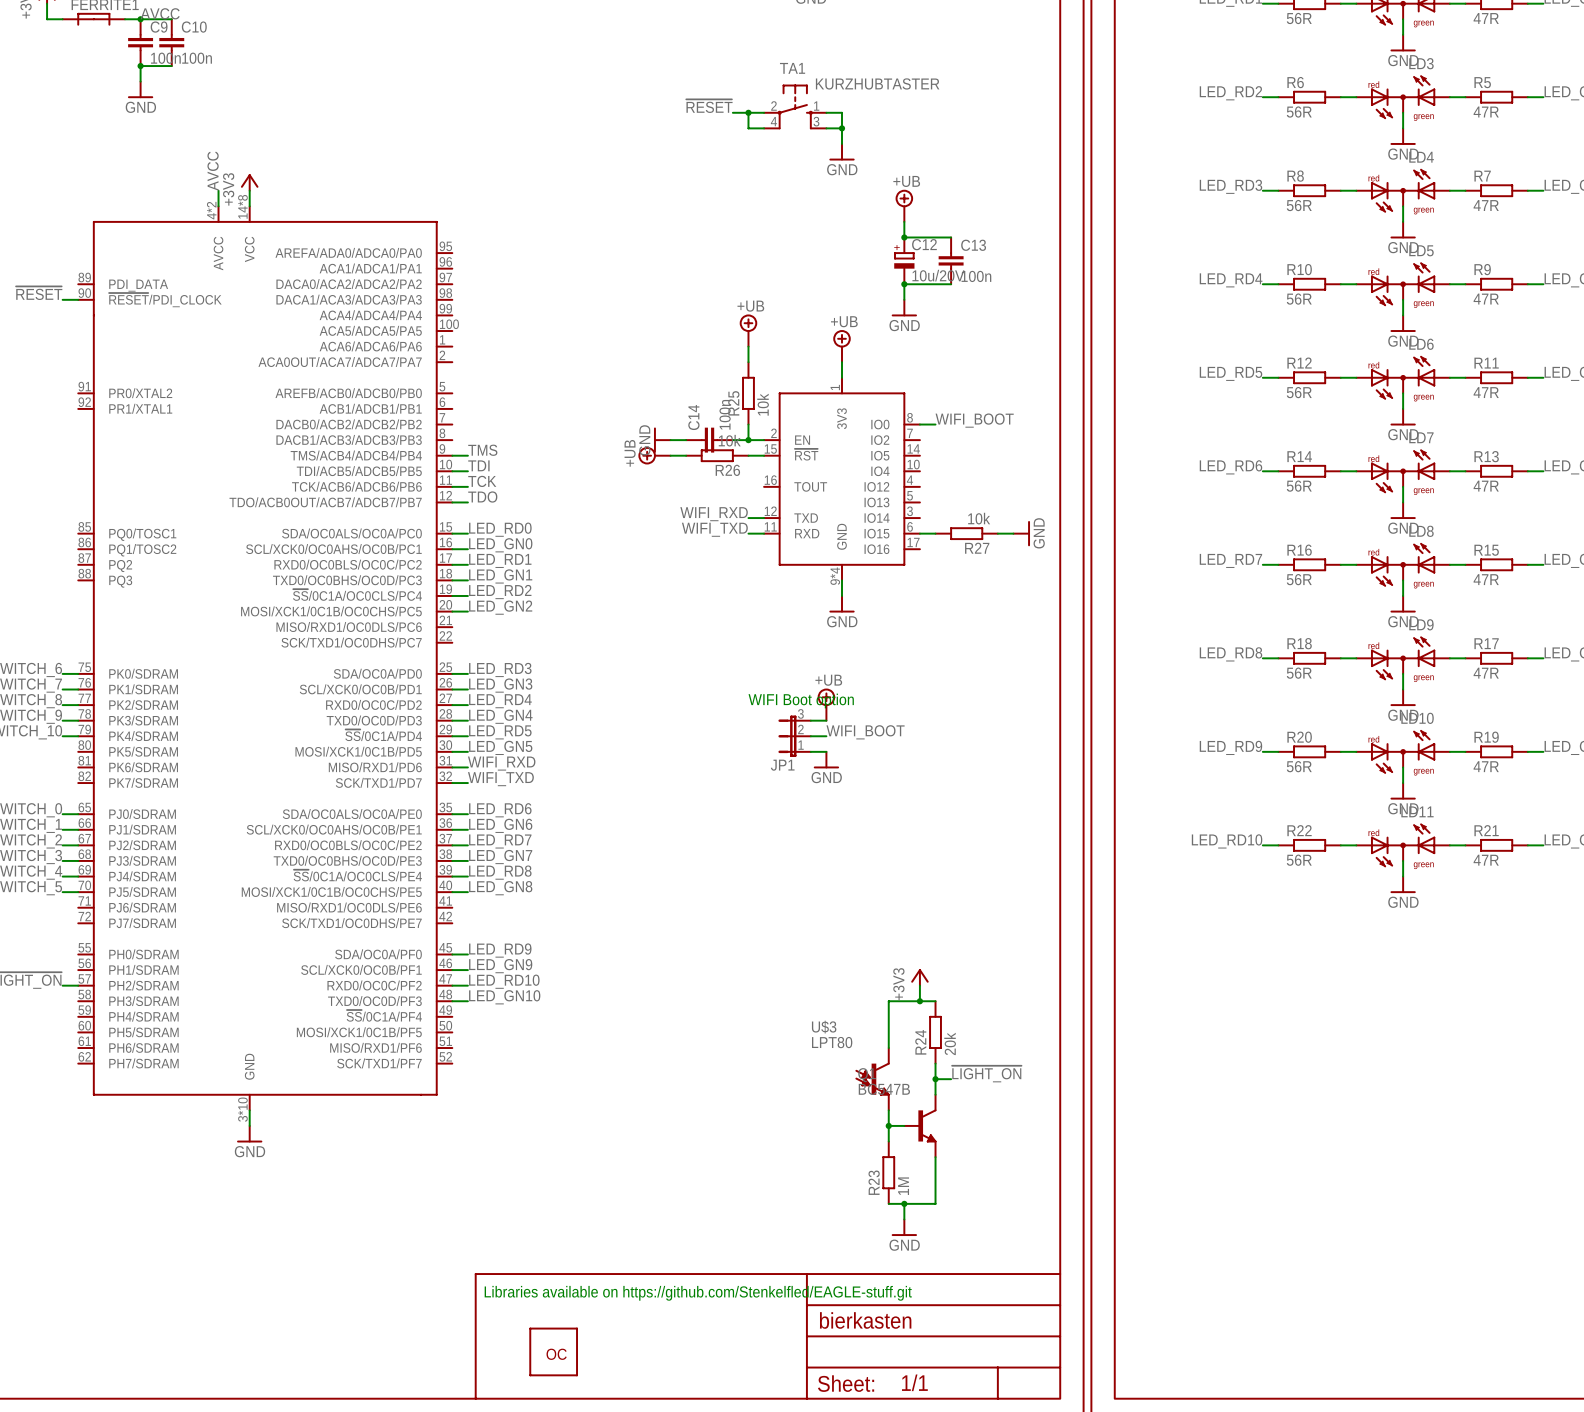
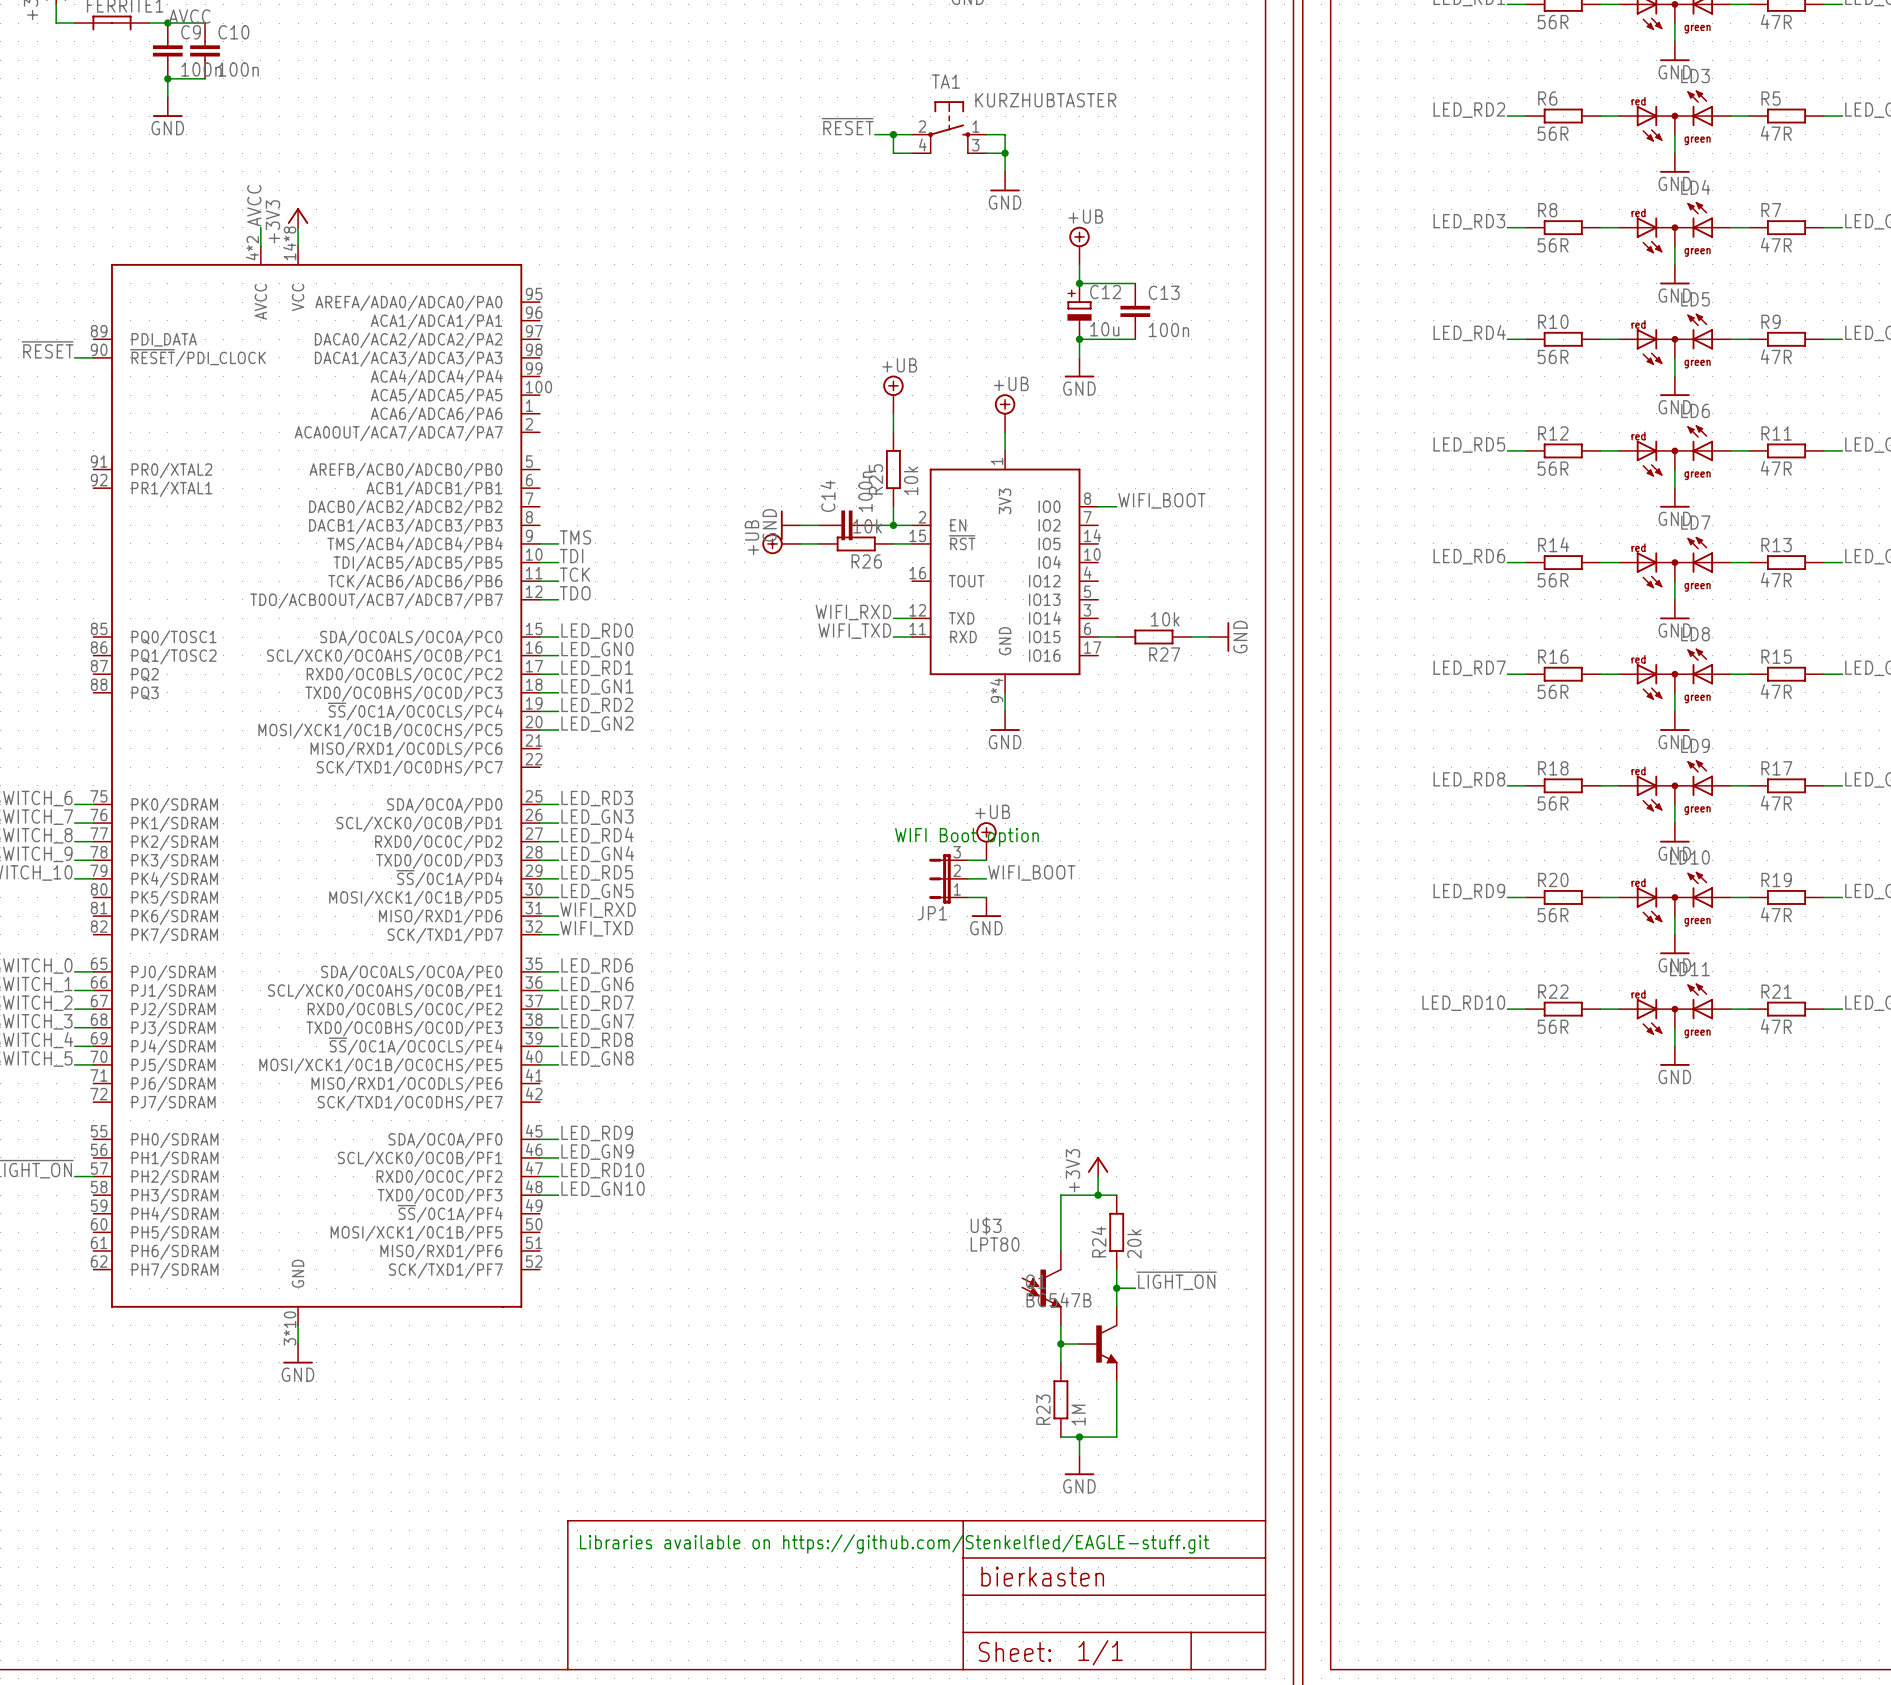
C12 value: 10u/20V (938, 275) -> 10u (1104, 329)
part: (553, 1351) -> none

